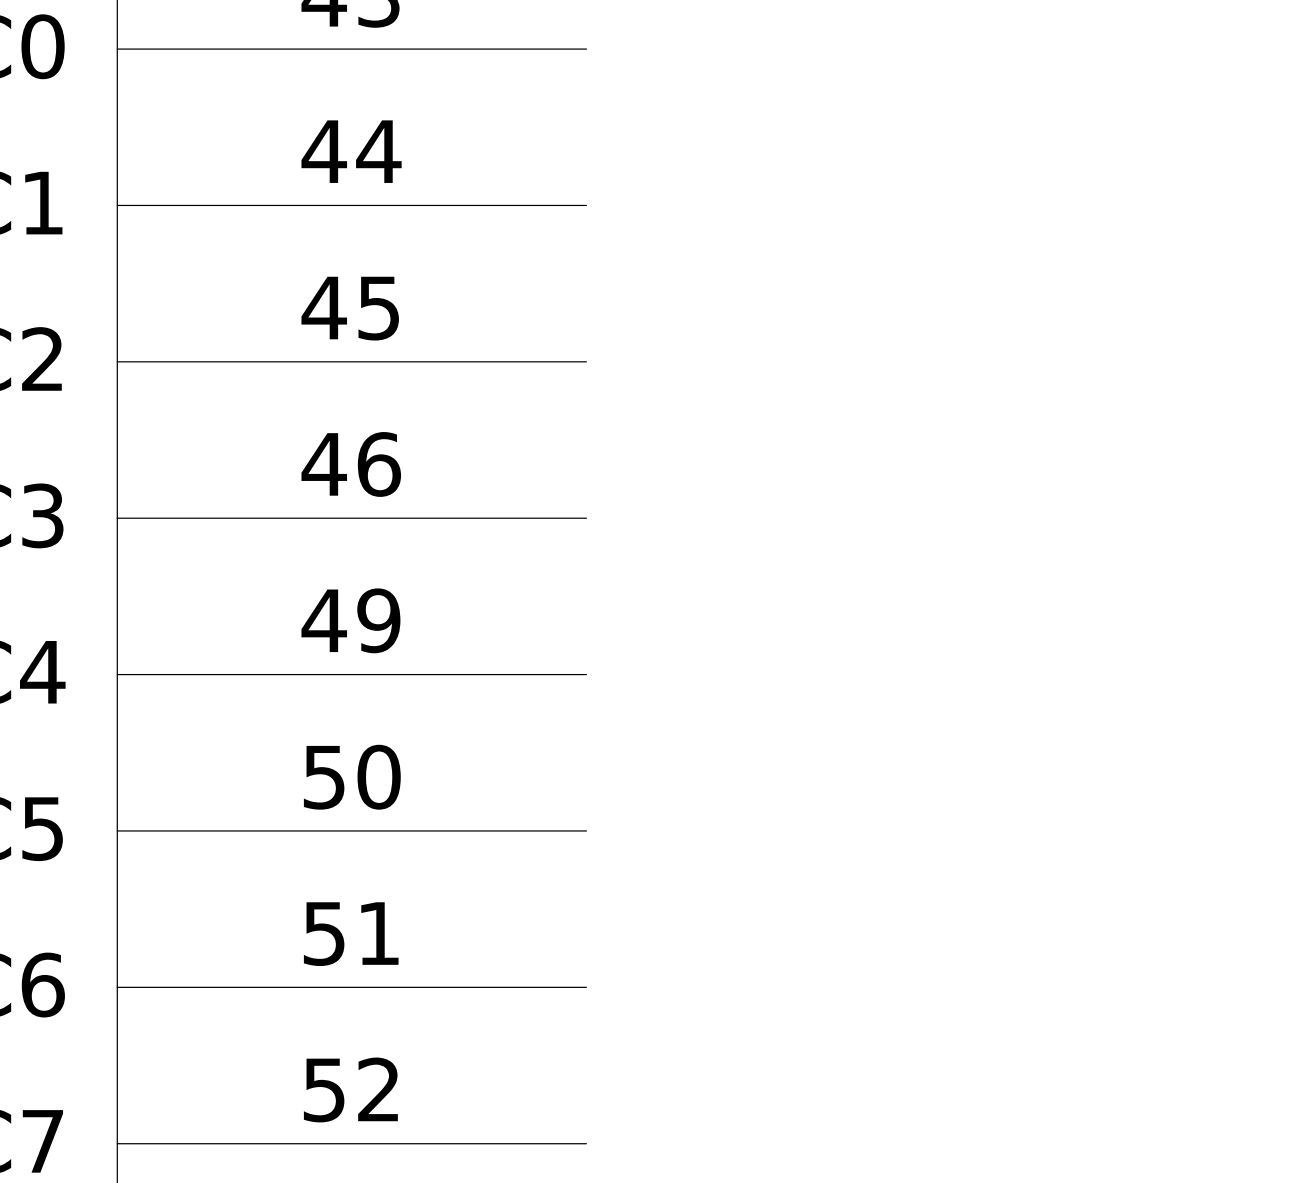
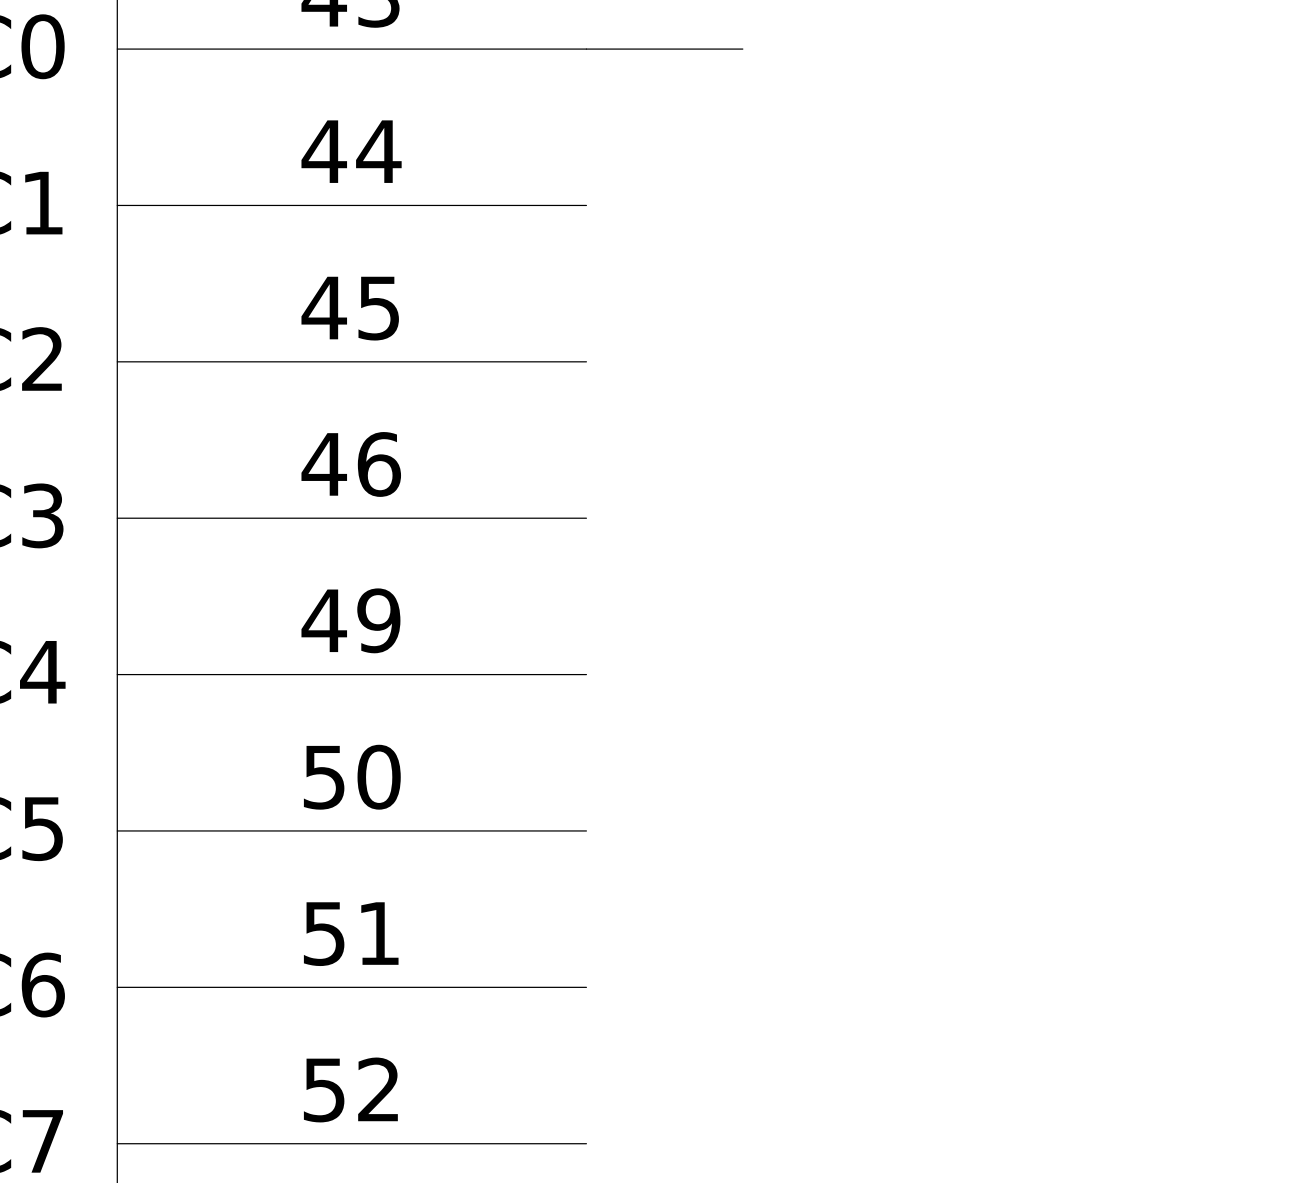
wire: none -> (586, 49) (742, 49)

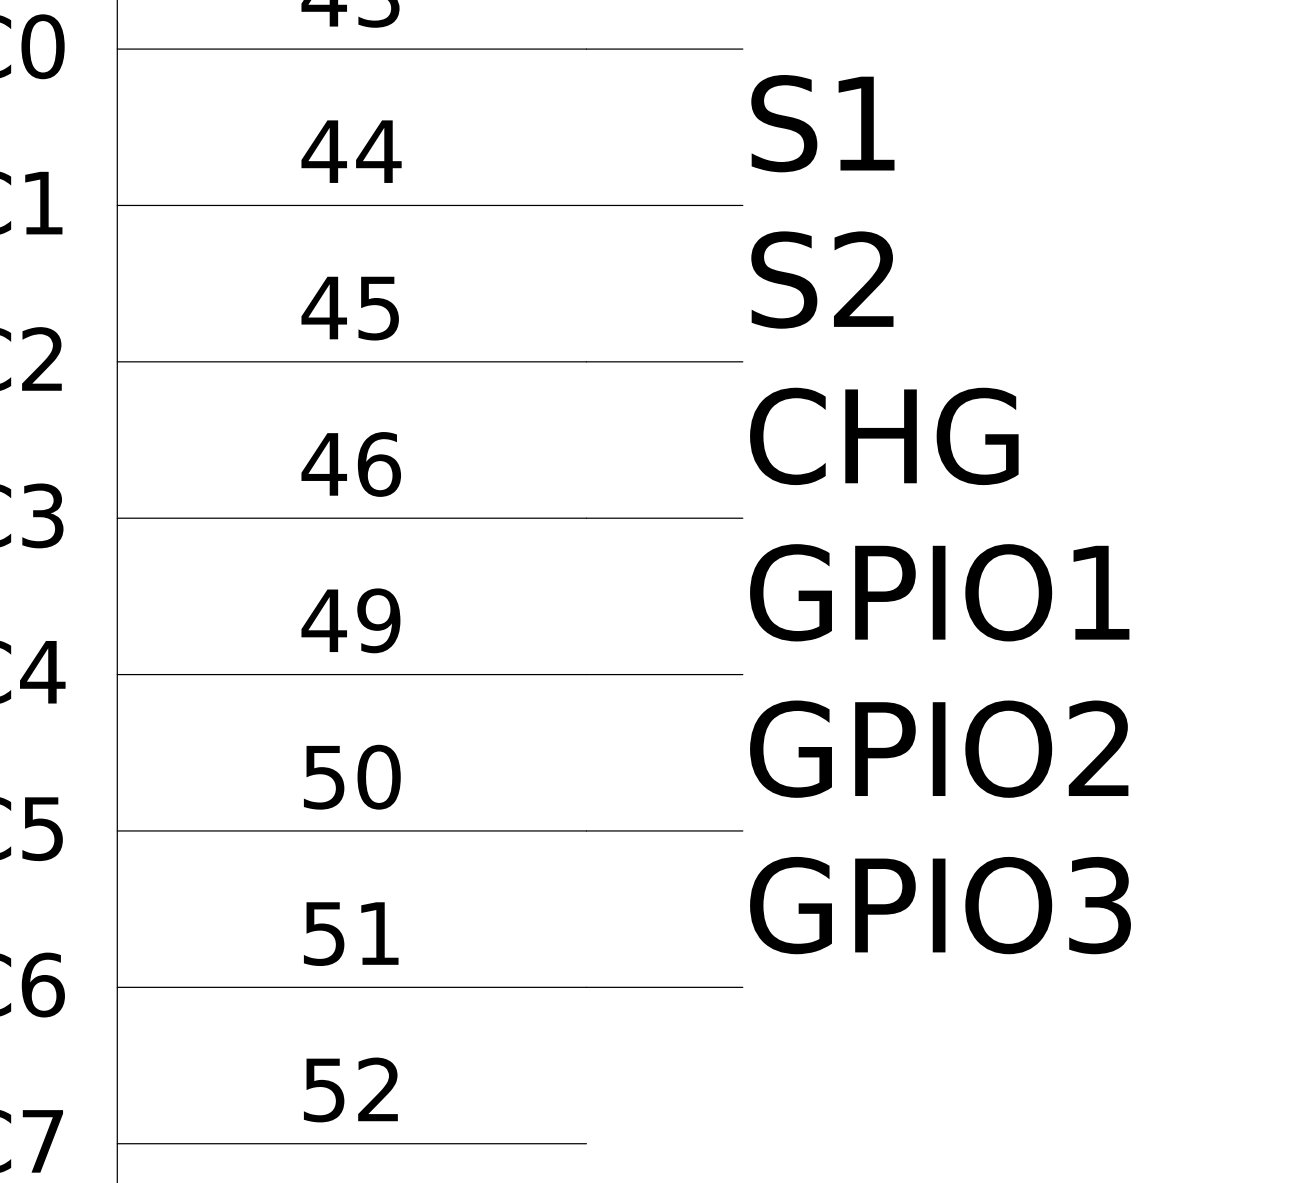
label: none -> S1 (822, 123)
wire: none -> (586, 205) (742, 205)
label: none -> S2 (822, 280)
wire: none -> (586, 361) (742, 361)
label: none -> CHG (884, 436)
wire: none -> (586, 518) (742, 518)
label: none -> GPIO1 (939, 592)
wire: none -> (586, 674) (742, 674)
label: none -> GPIO2 (939, 749)
wire: none -> (586, 830) (742, 830)
label: none -> GPIO3 (940, 905)
wire: none -> (586, 987) (742, 987)

